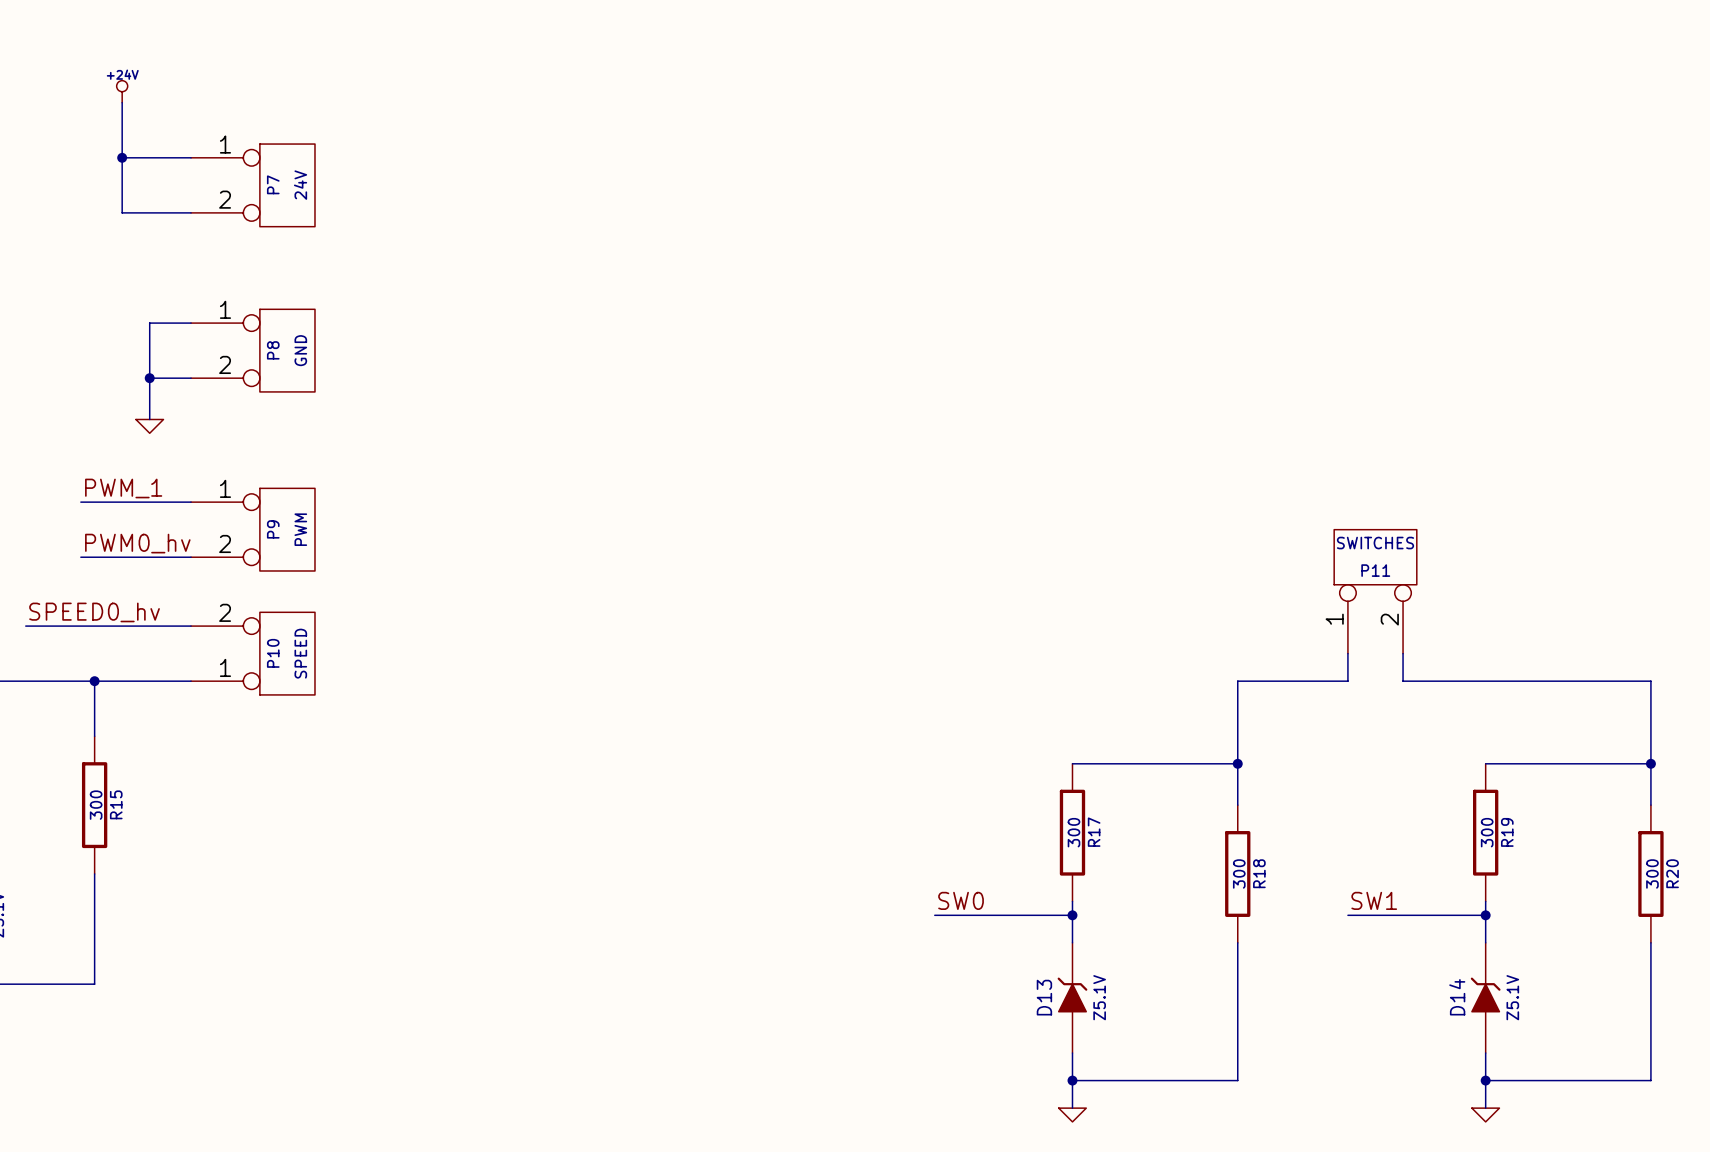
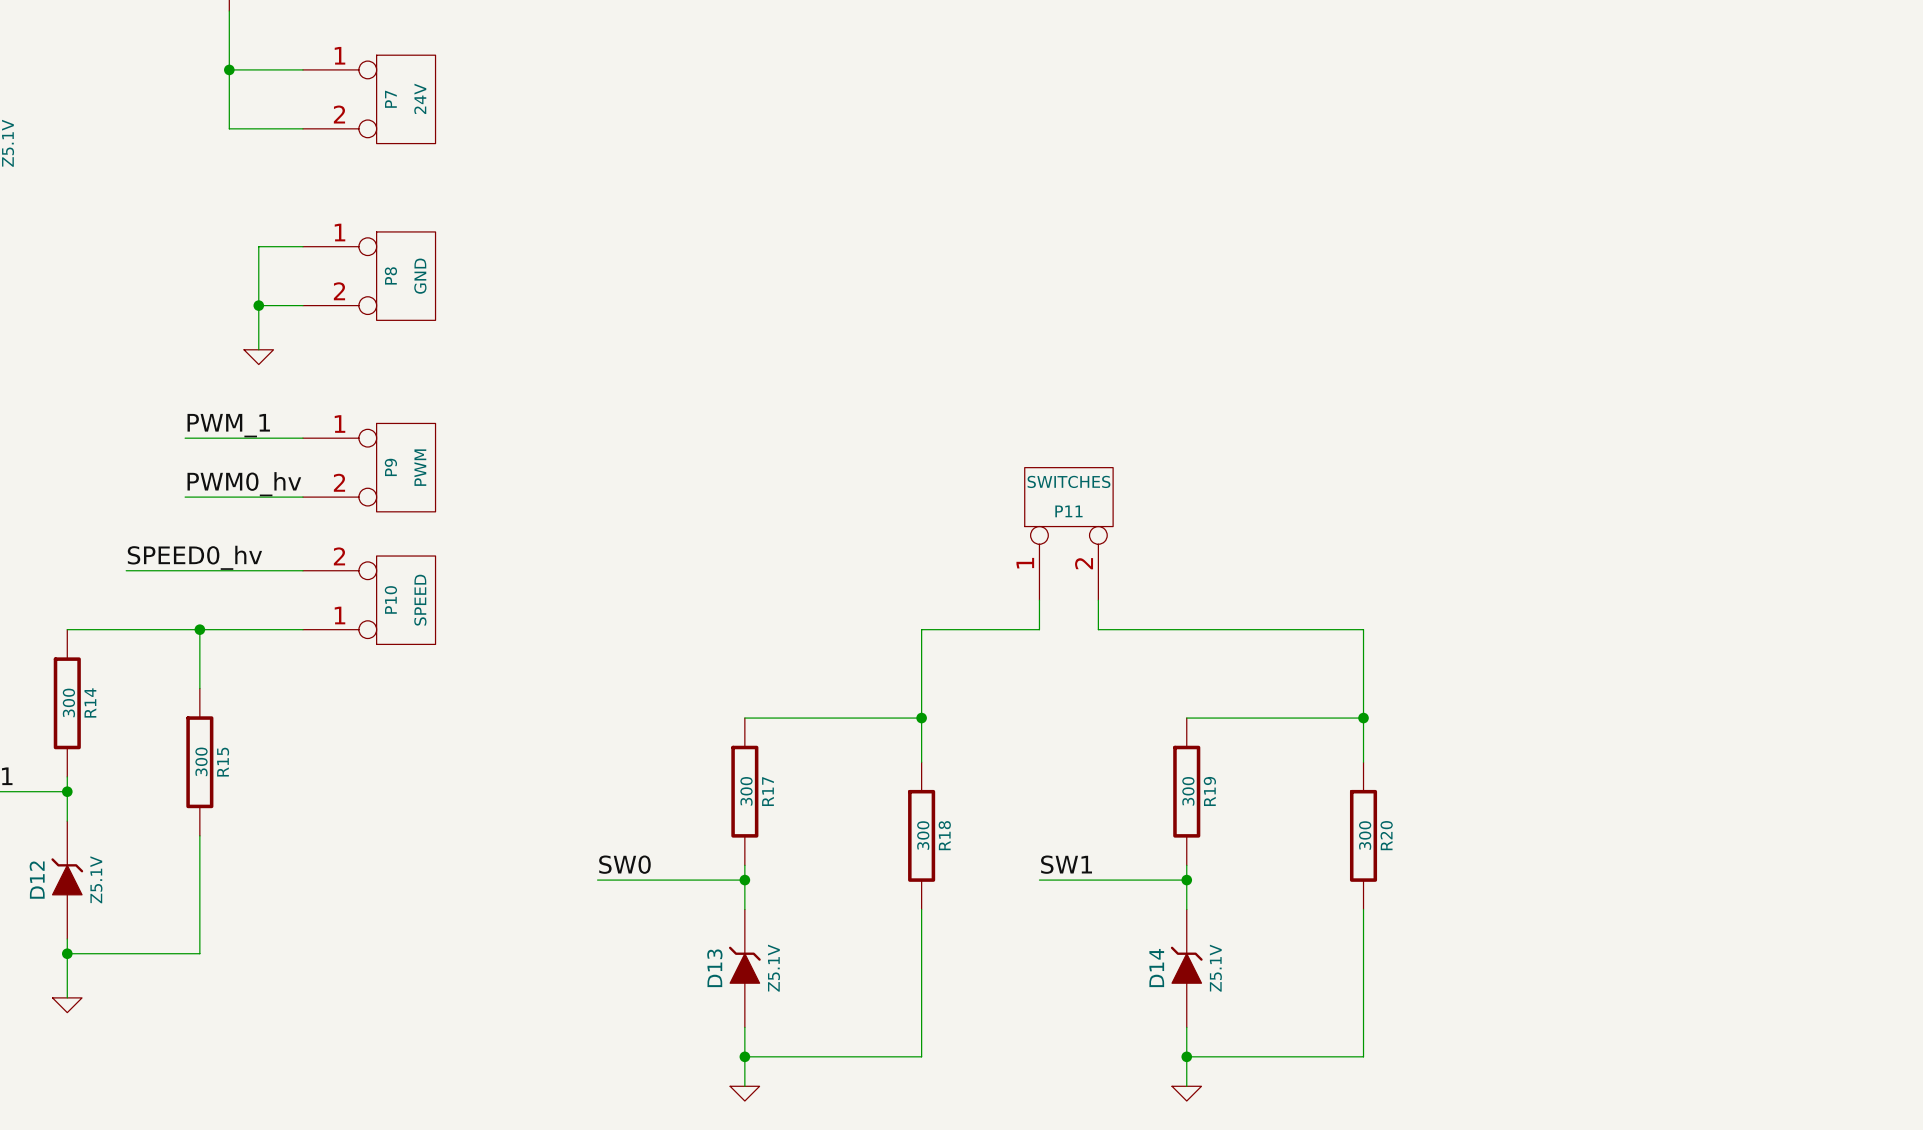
P11 position: (1375, 591) -> (1068, 533)
wire: none -> (1039, 600) (1039, 629) (921, 629) (921, 762)
wire: none -> (1098, 600) (1098, 629) (1363, 629) (1363, 762)
wire: (1347, 653) (1347, 681) (1237, 681) (1237, 805) -> none
wire: (1403, 653) (1403, 681) (1650, 681) (1650, 805) -> none
wire: none -> (744, 718) (921, 718)
junction: none -> (921, 718)
wire: (1182, 763) (1237, 763) -> (1186, 718) (1245, 718)
junction position: (1237, 763) -> (1363, 718)
wire: (1485, 763) (1650, 763) -> none
junction: (1650, 763) -> none
R17 position: (1072, 832) -> (744, 791)
R19 position: (1485, 832) -> (1186, 791)
R18 position: (1237, 873) -> (921, 835)
R20 position: (1650, 873) -> (1363, 835)
label: none -> SW0 (624, 864)
label: SW0 (961, 900) -> SW1 (1066, 864)
label: SW1 (1374, 900) -> none
wire: none -> (744, 865) (744, 909)
wire: (1072, 901) (1072, 942) -> (1186, 865) (1186, 909)
wire: (1485, 901) (1485, 942) -> none
wire: none -> (597, 880) (744, 880)
junction: none -> (744, 880)
wire: (1017, 915) (1072, 915) -> (1039, 880) (1098, 880)
junction position: (1072, 915) -> (1186, 880)
wire: (1347, 915) (1485, 915) -> none
junction: (1485, 915) -> none
wire: none -> (921, 909) (921, 1056) (744, 1056)
wire: (1237, 942) (1237, 1080) (1182, 1080) -> (1363, 909) (1363, 1056)
wire: (1650, 942) (1650, 1080) (1485, 1080) -> none
D13 position: (1072, 997) -> (744, 968)
D14 position: (1485, 997) -> (1186, 968)
wire: none -> (744, 1027) (744, 1086)
wire: (1072, 1053) (1072, 1108) -> (1186, 1027) (1186, 1086)
wire: (1485, 1053) (1485, 1108) -> none
junction: none -> (744, 1056)
wire: none -> (1186, 1056) (1245, 1056)
junction position: (1072, 1080) -> (1186, 1056)
junction: (1485, 1080) -> none
power symbol: none -> (744, 1093)
power symbol position: (1072, 1115) -> (1186, 1093)
power symbol: (1485, 1115) -> none

